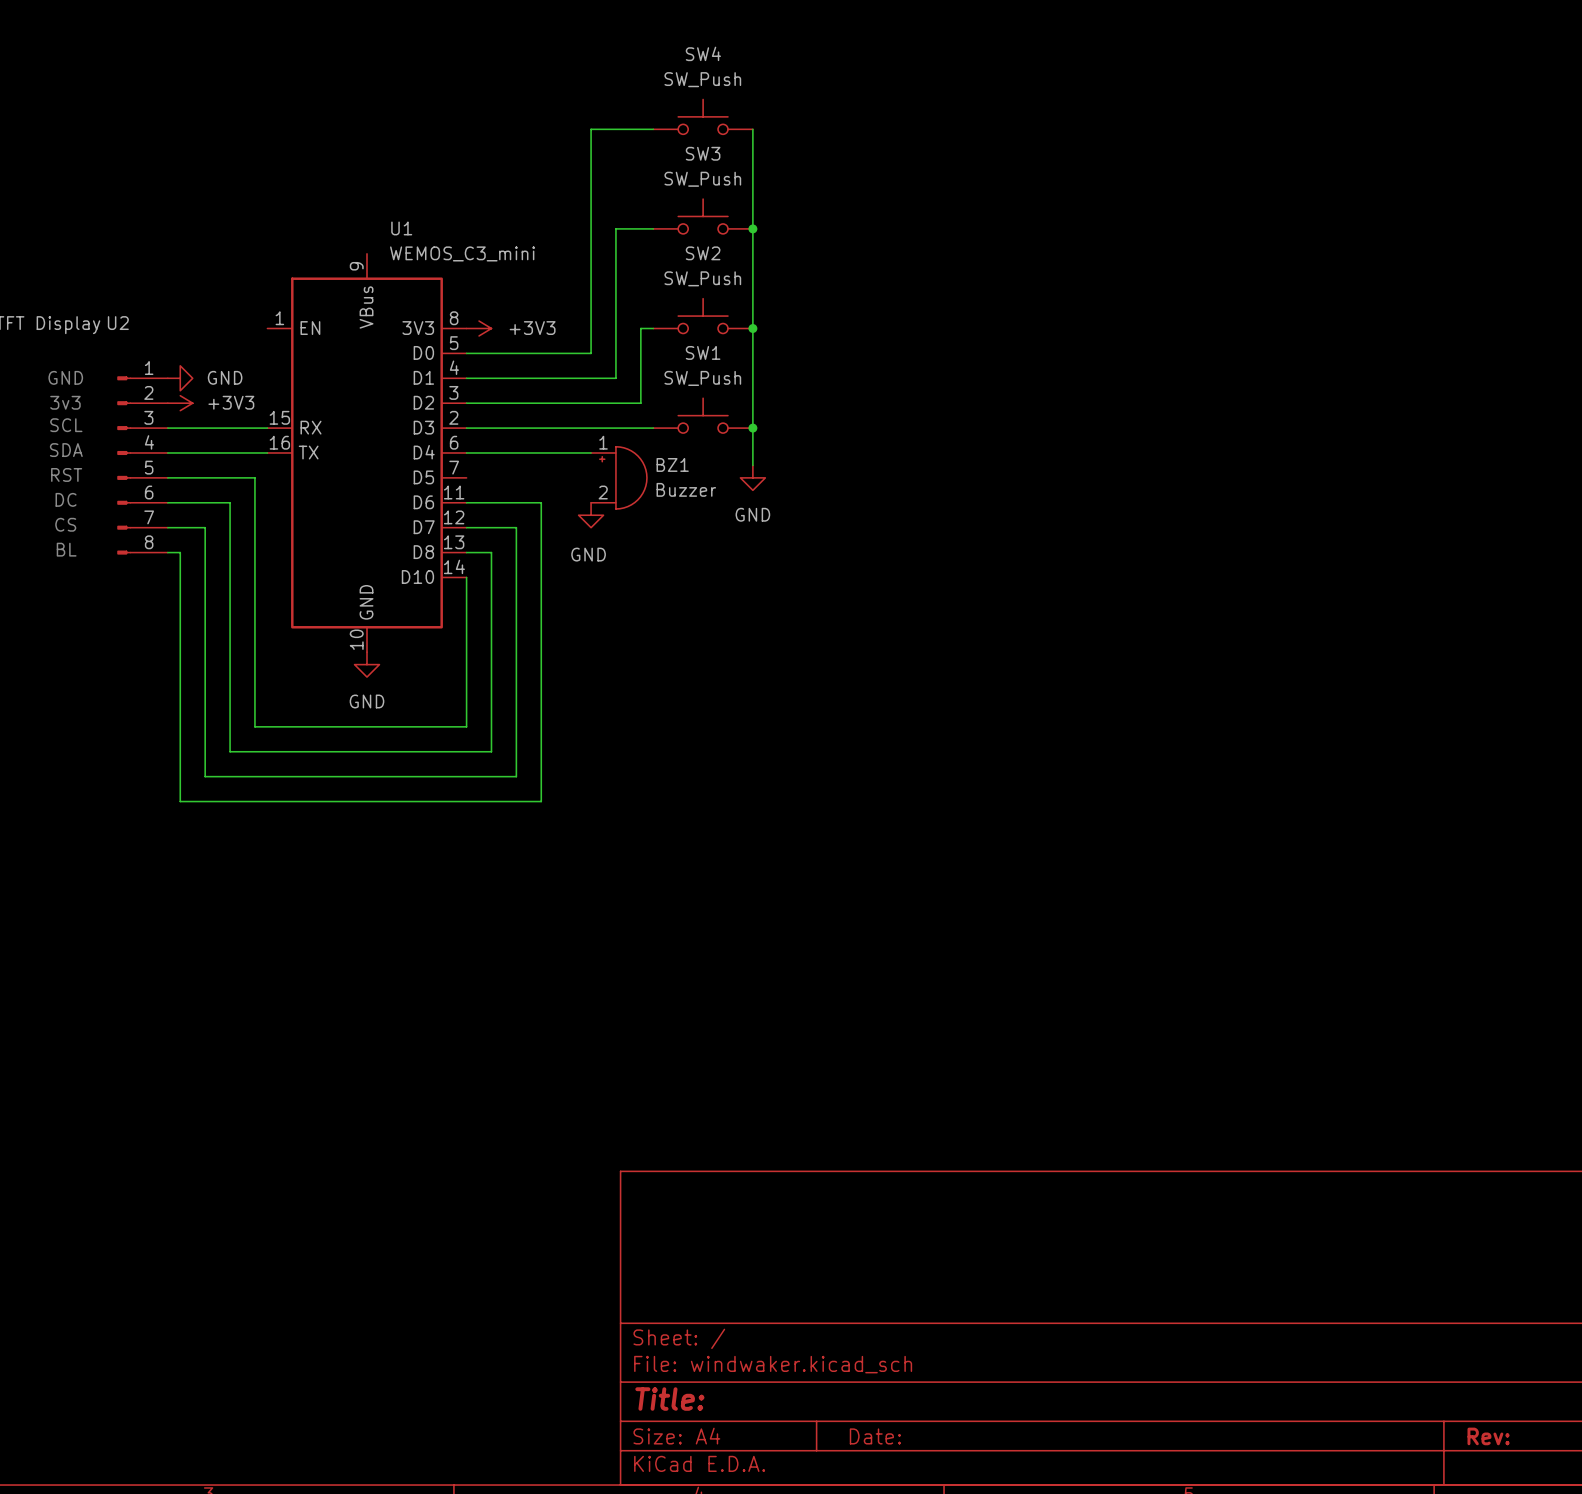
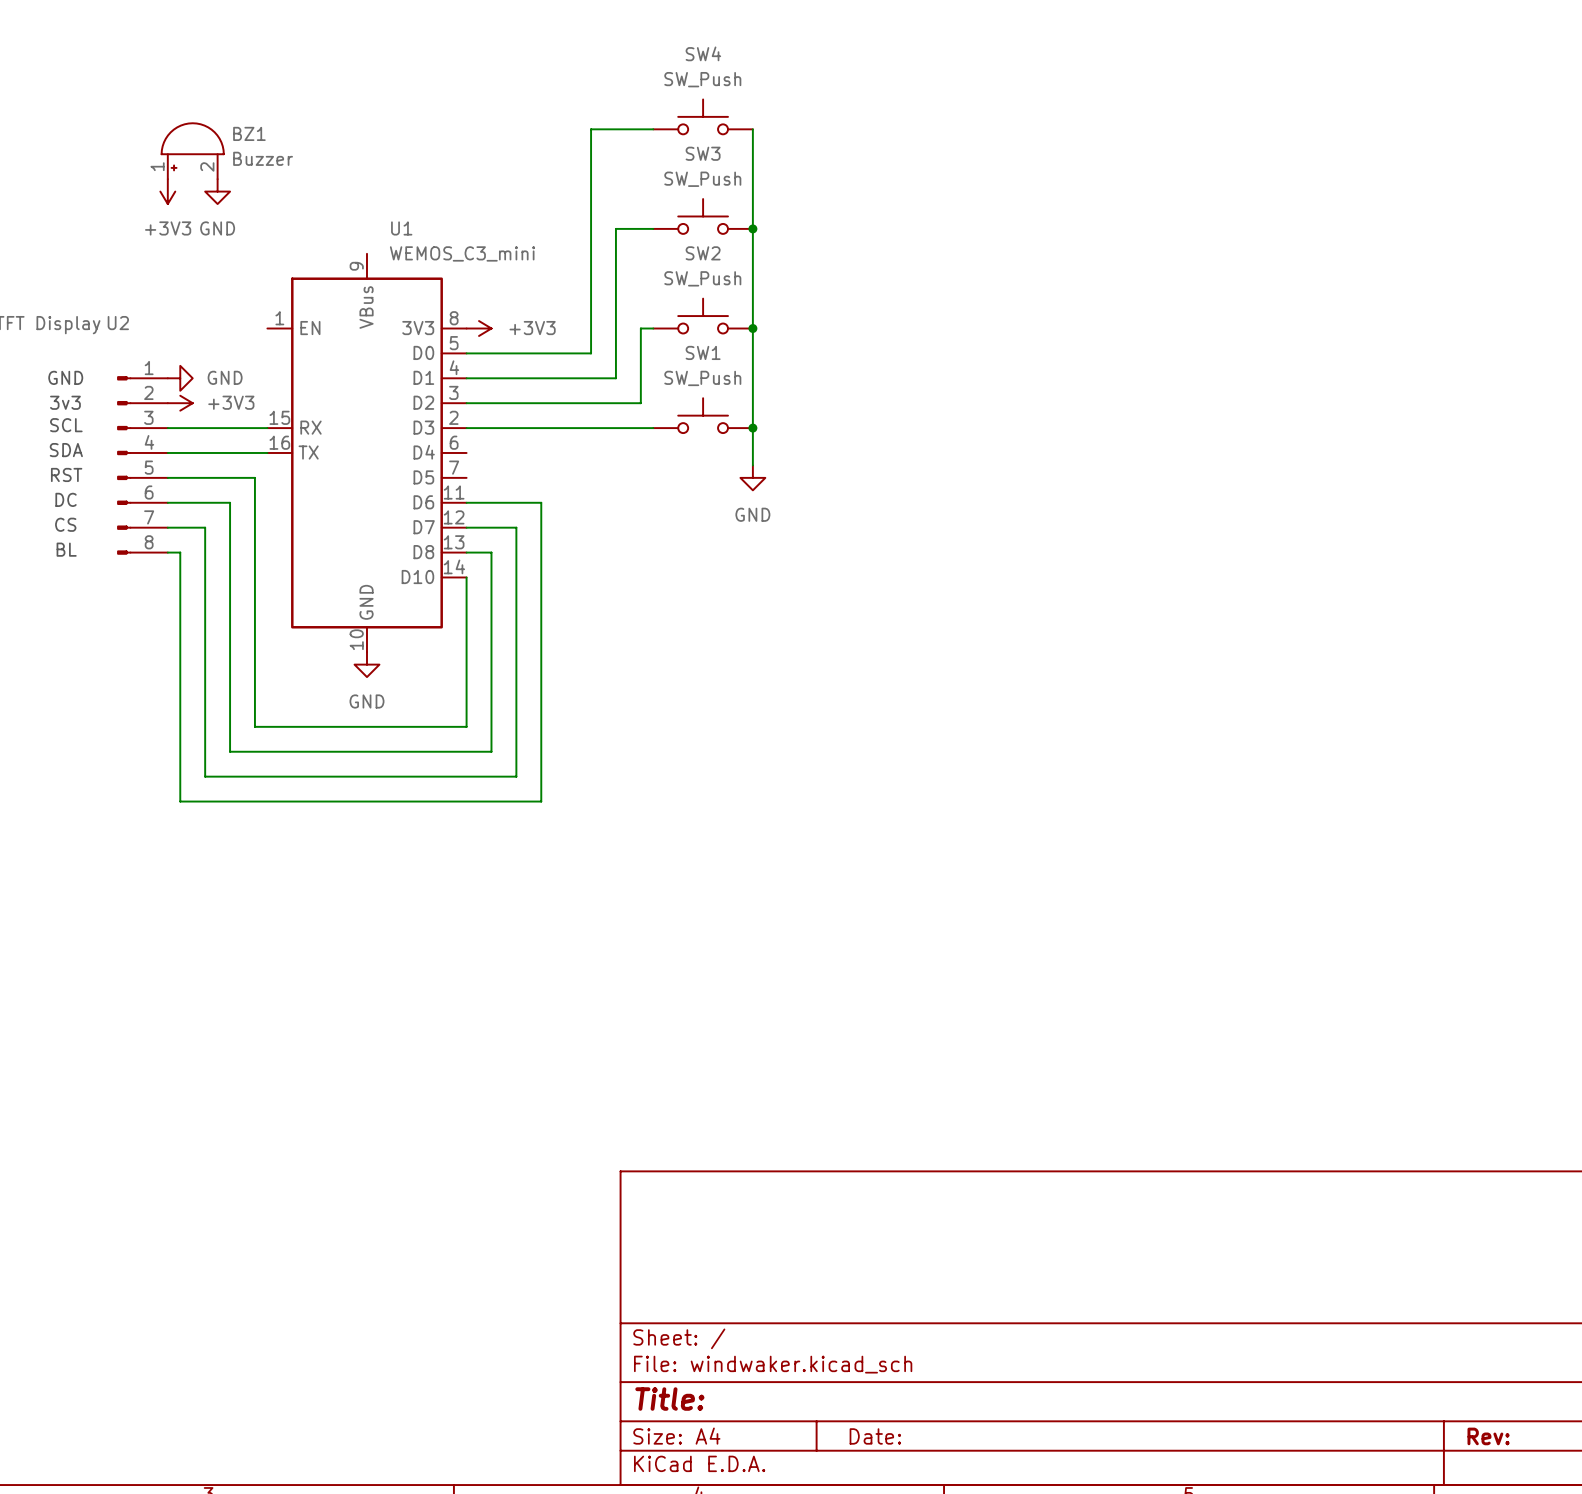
power symbol: none -> +3V3 (167, 191)
power symbol: none -> GND (217, 191)
wire: (466, 452) (591, 452) -> none
BZ1 position: (619, 477) -> (192, 151)
BZ1 rotation: 0° (623, 477) -> 90° counterclockwise (192, 146)
power symbol: GND (591, 515) -> none

